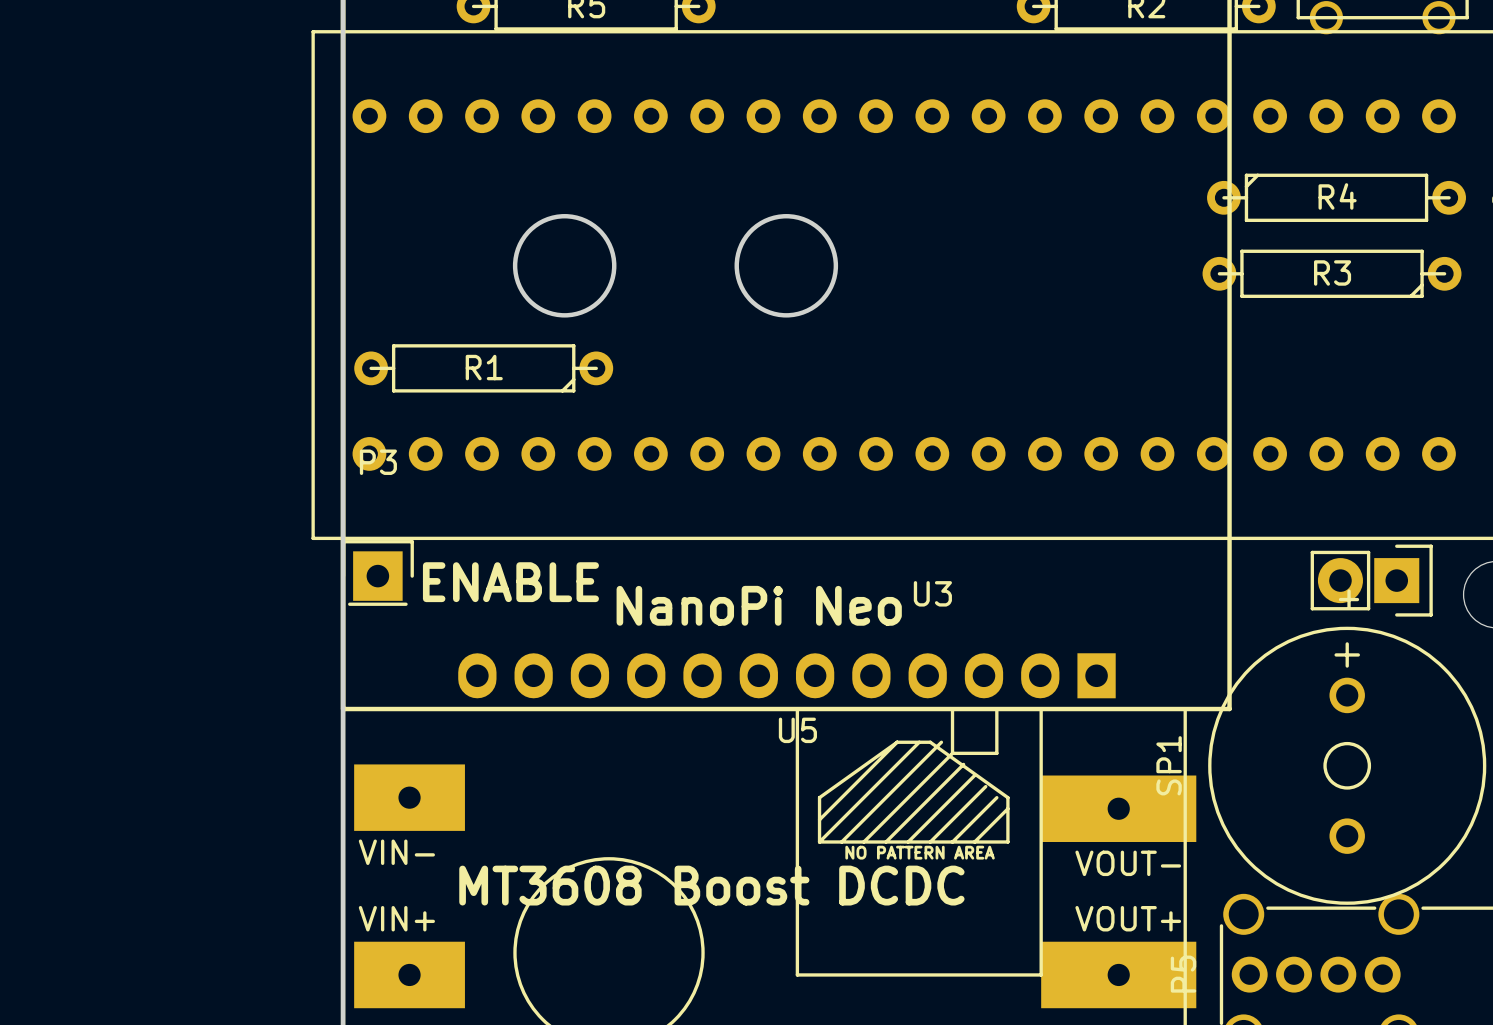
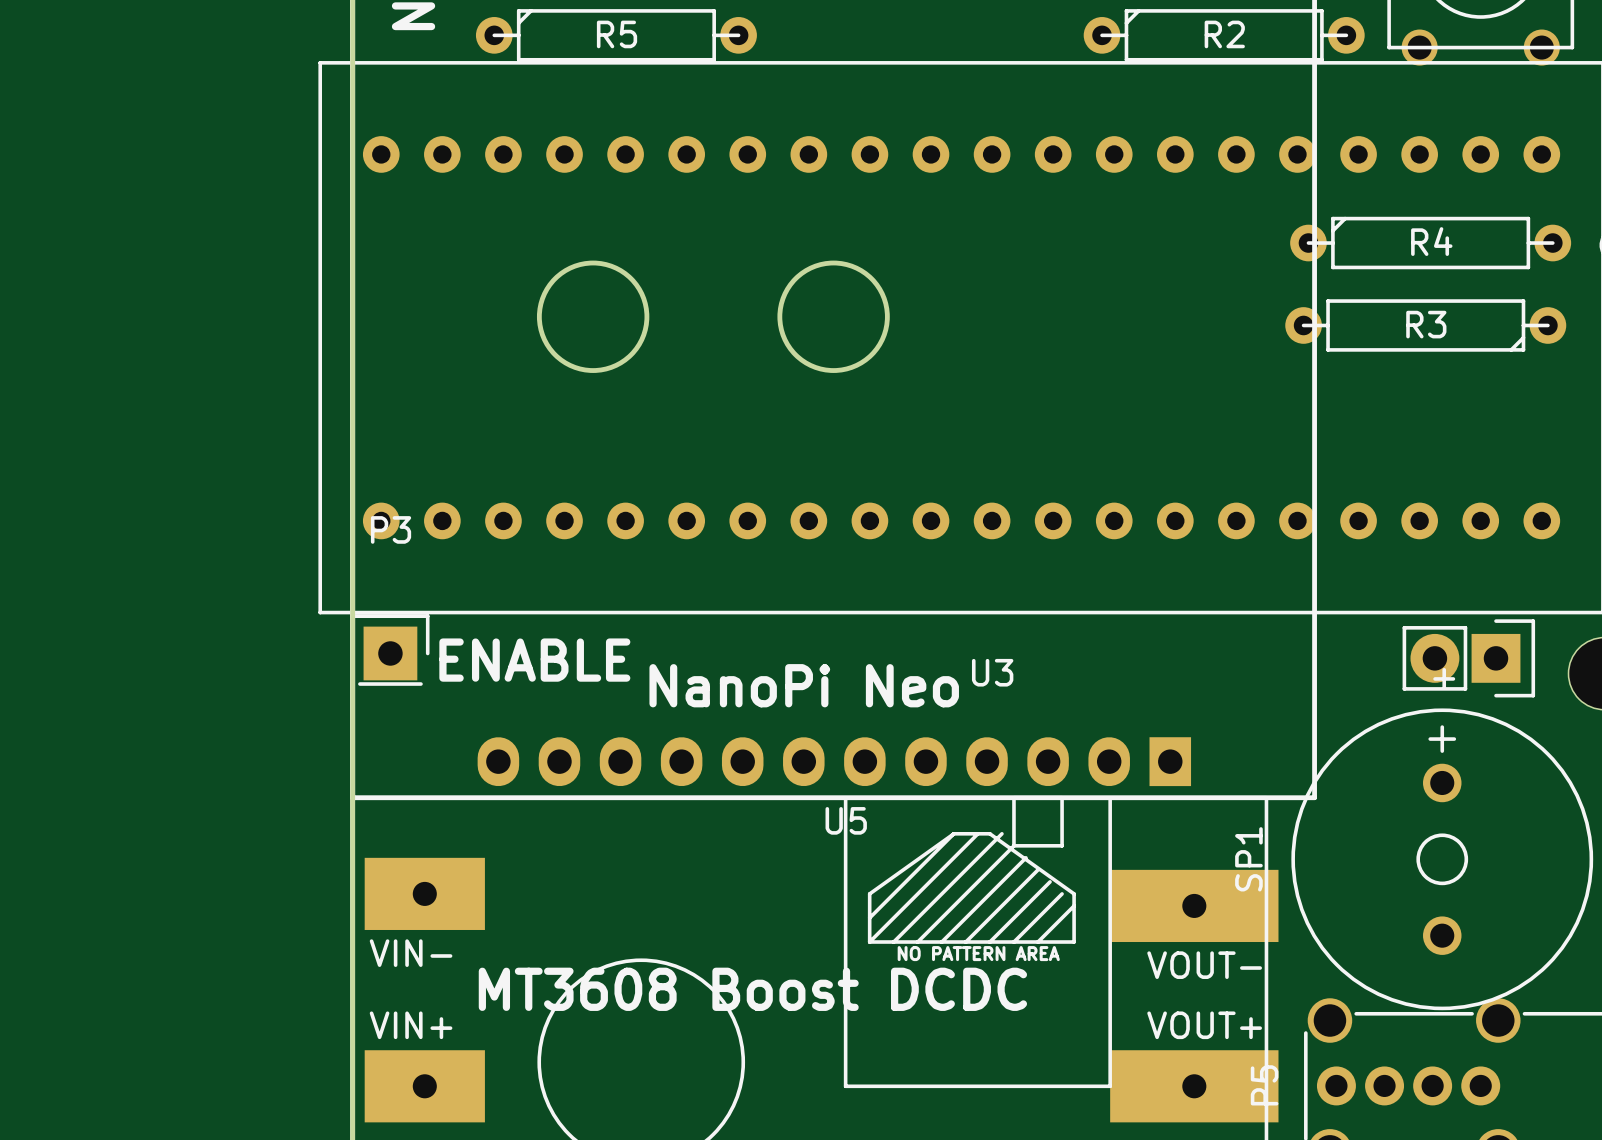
R1: (483, 368) -> none

